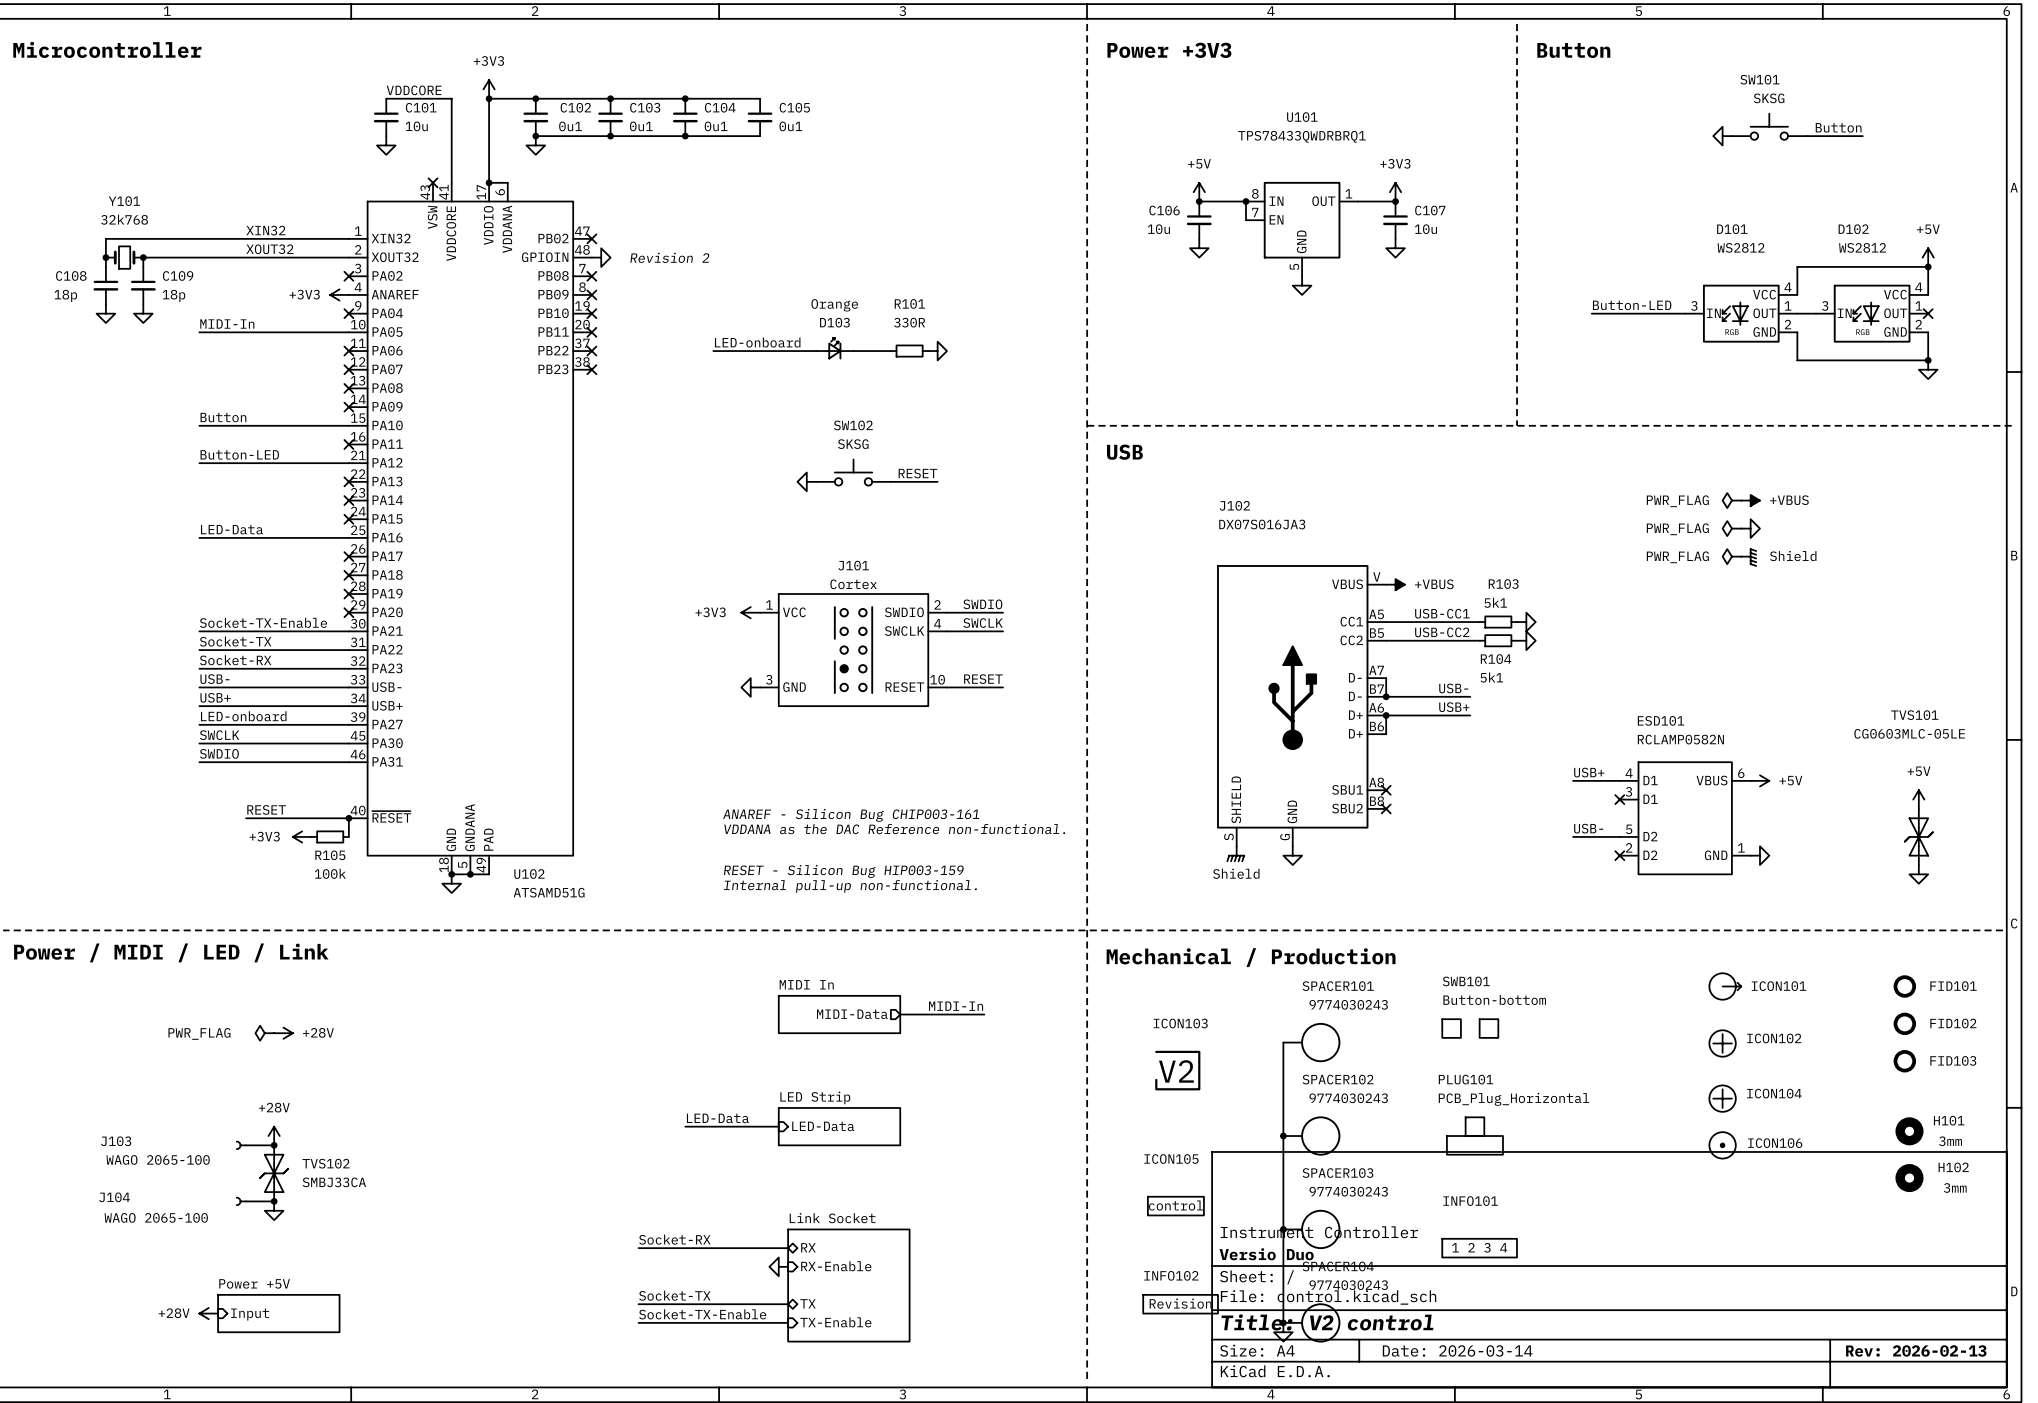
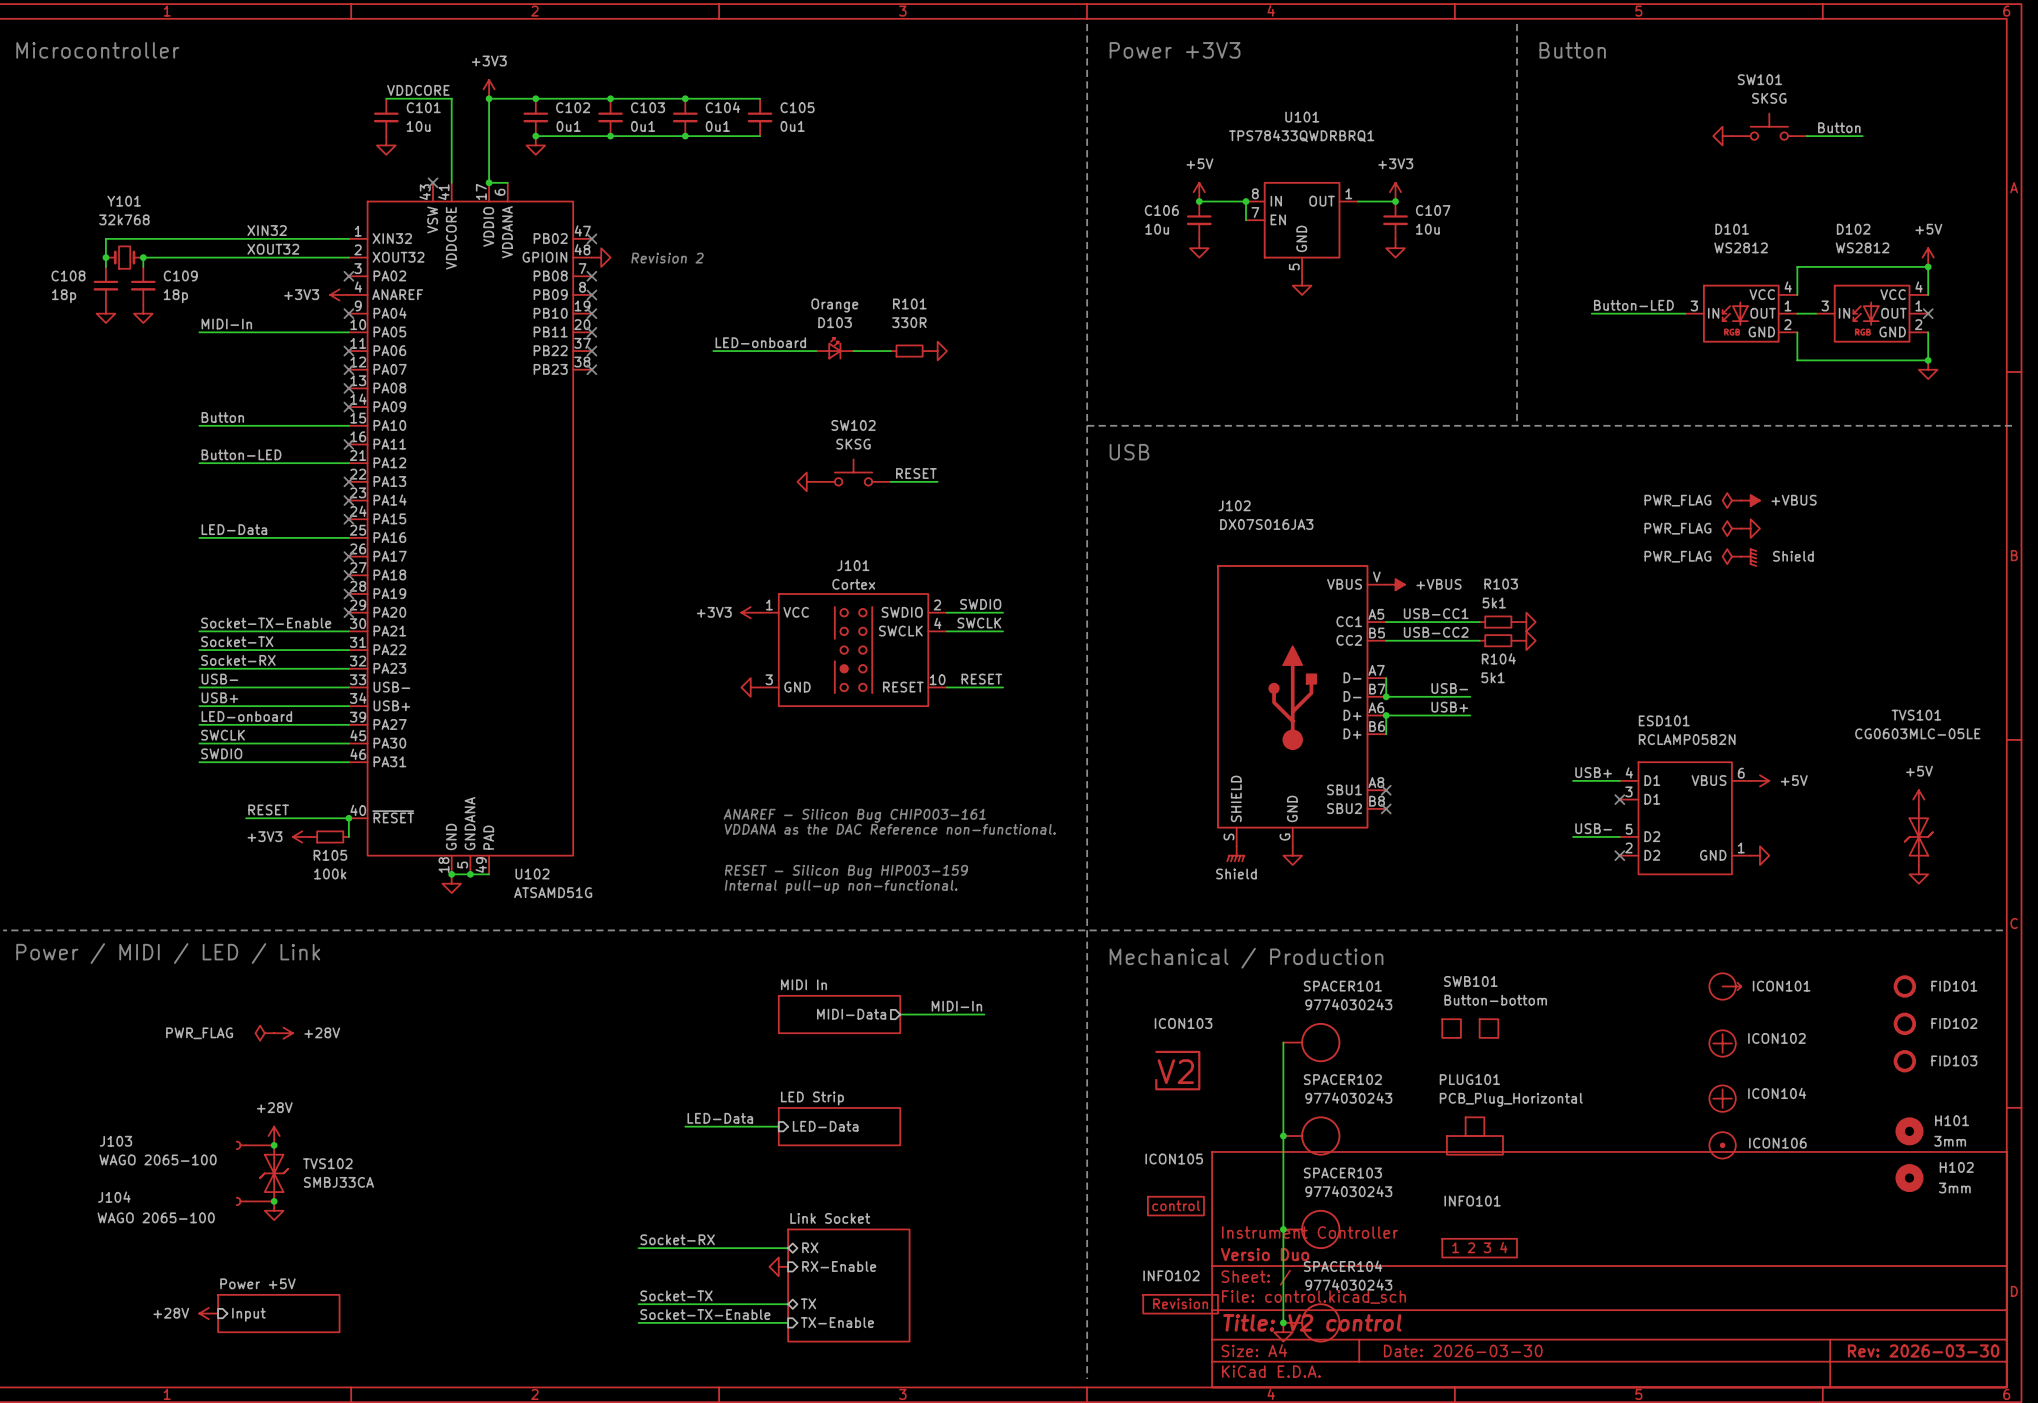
title block: Date: 2026-03-14 (1457, 1350) -> Date: 2026-03-30 (1463, 1350)
title block: Rev: 2026-02-13 (1916, 1350) -> Rev: 2026-03-30 (1923, 1350)

